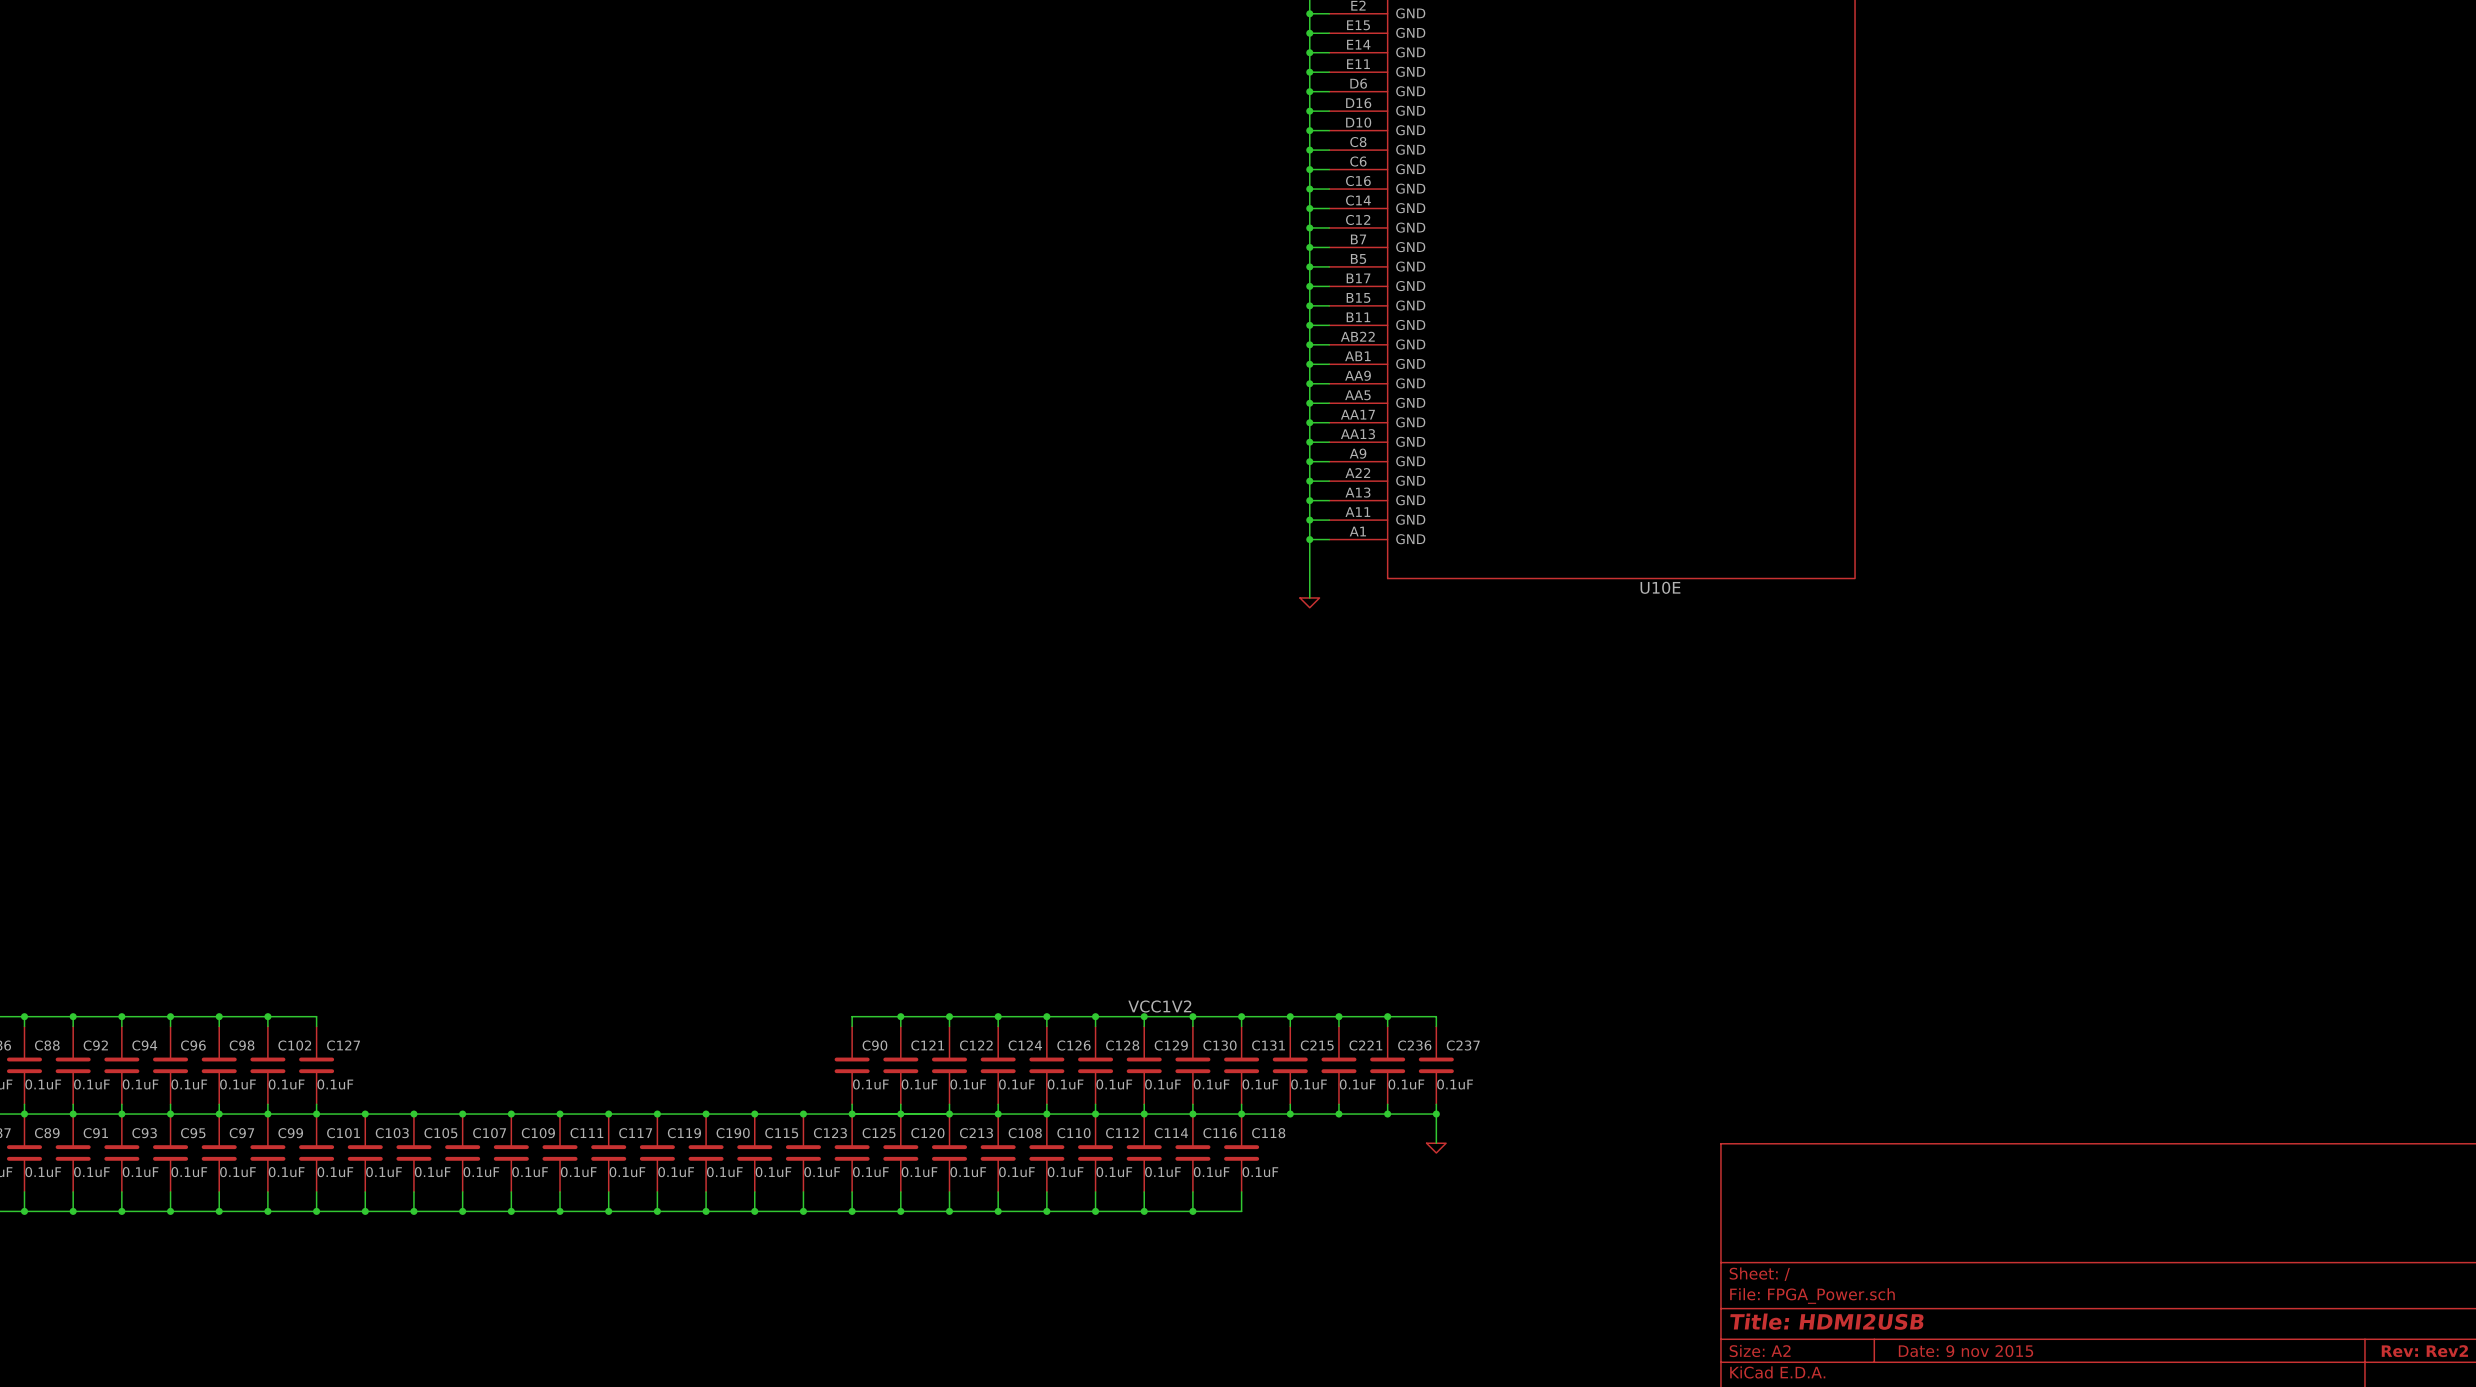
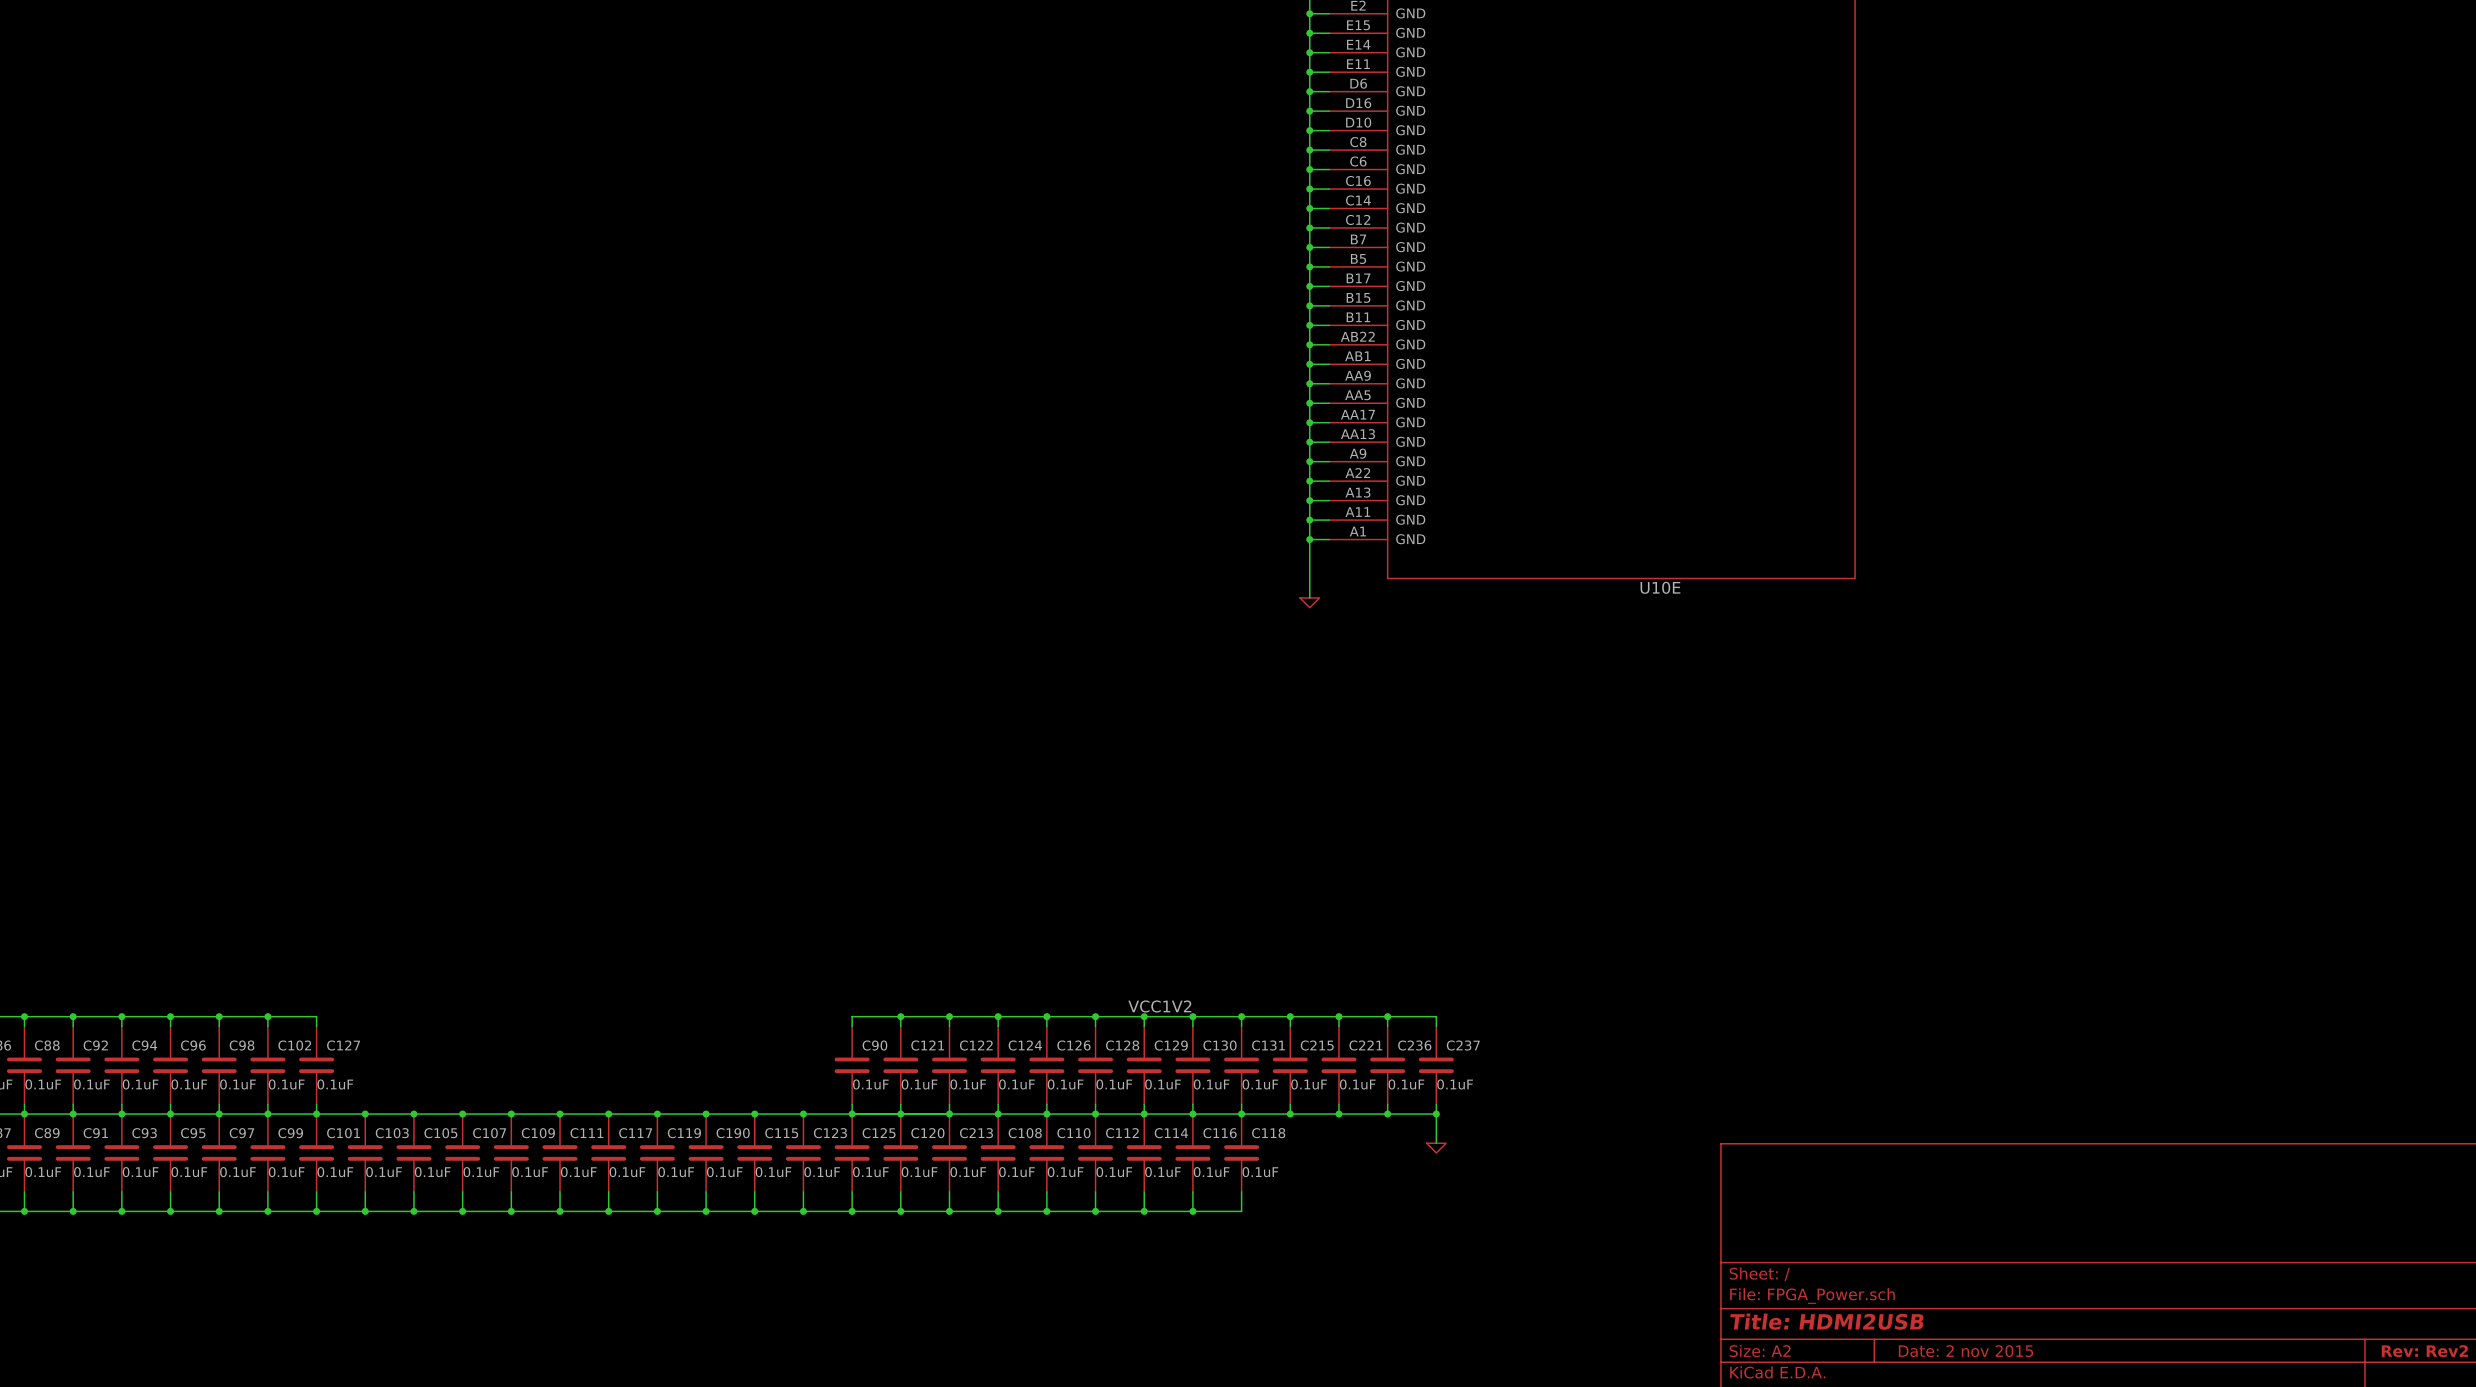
title block: Date: 9 nov 2015 (1966, 1351) -> Date: 2 nov 2015 (1966, 1351)

